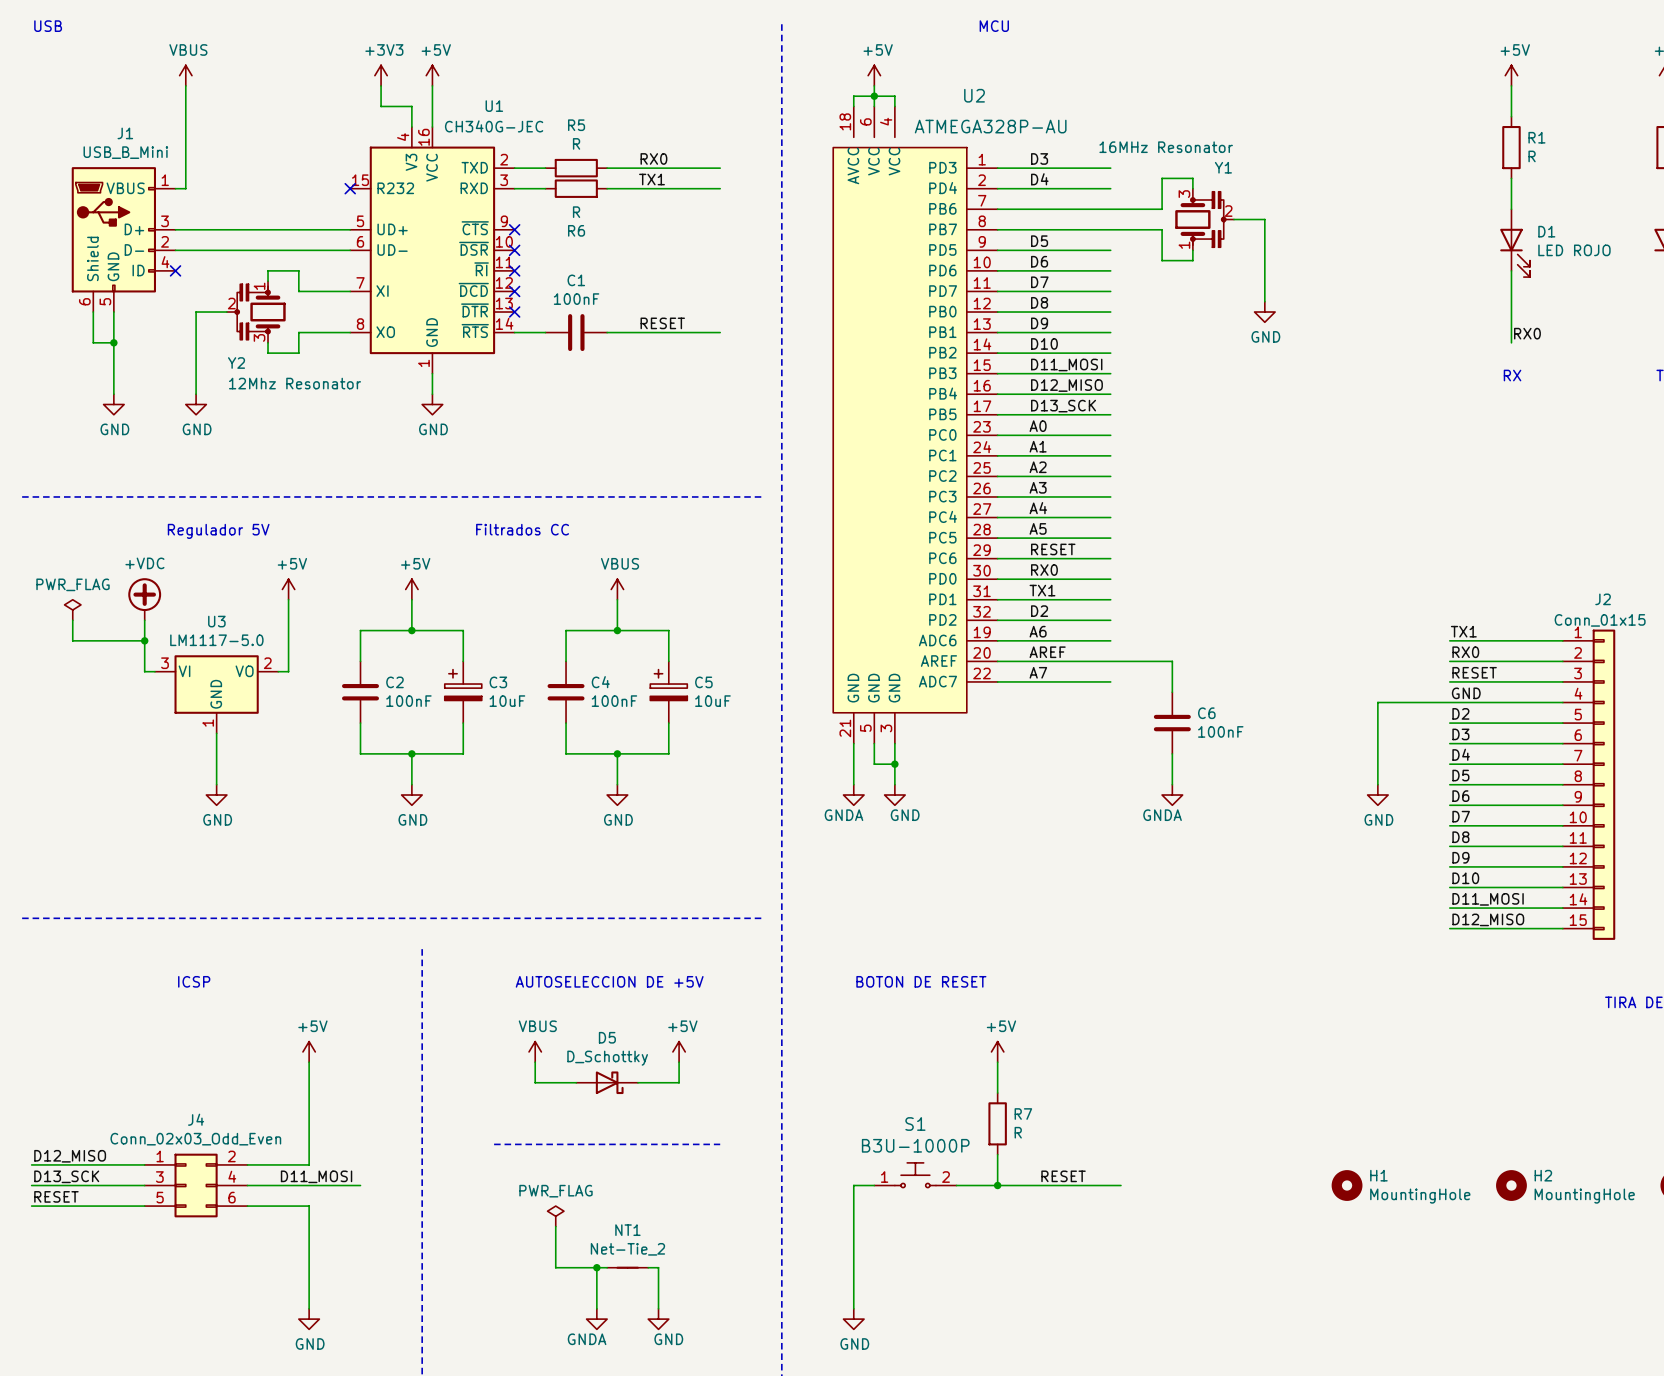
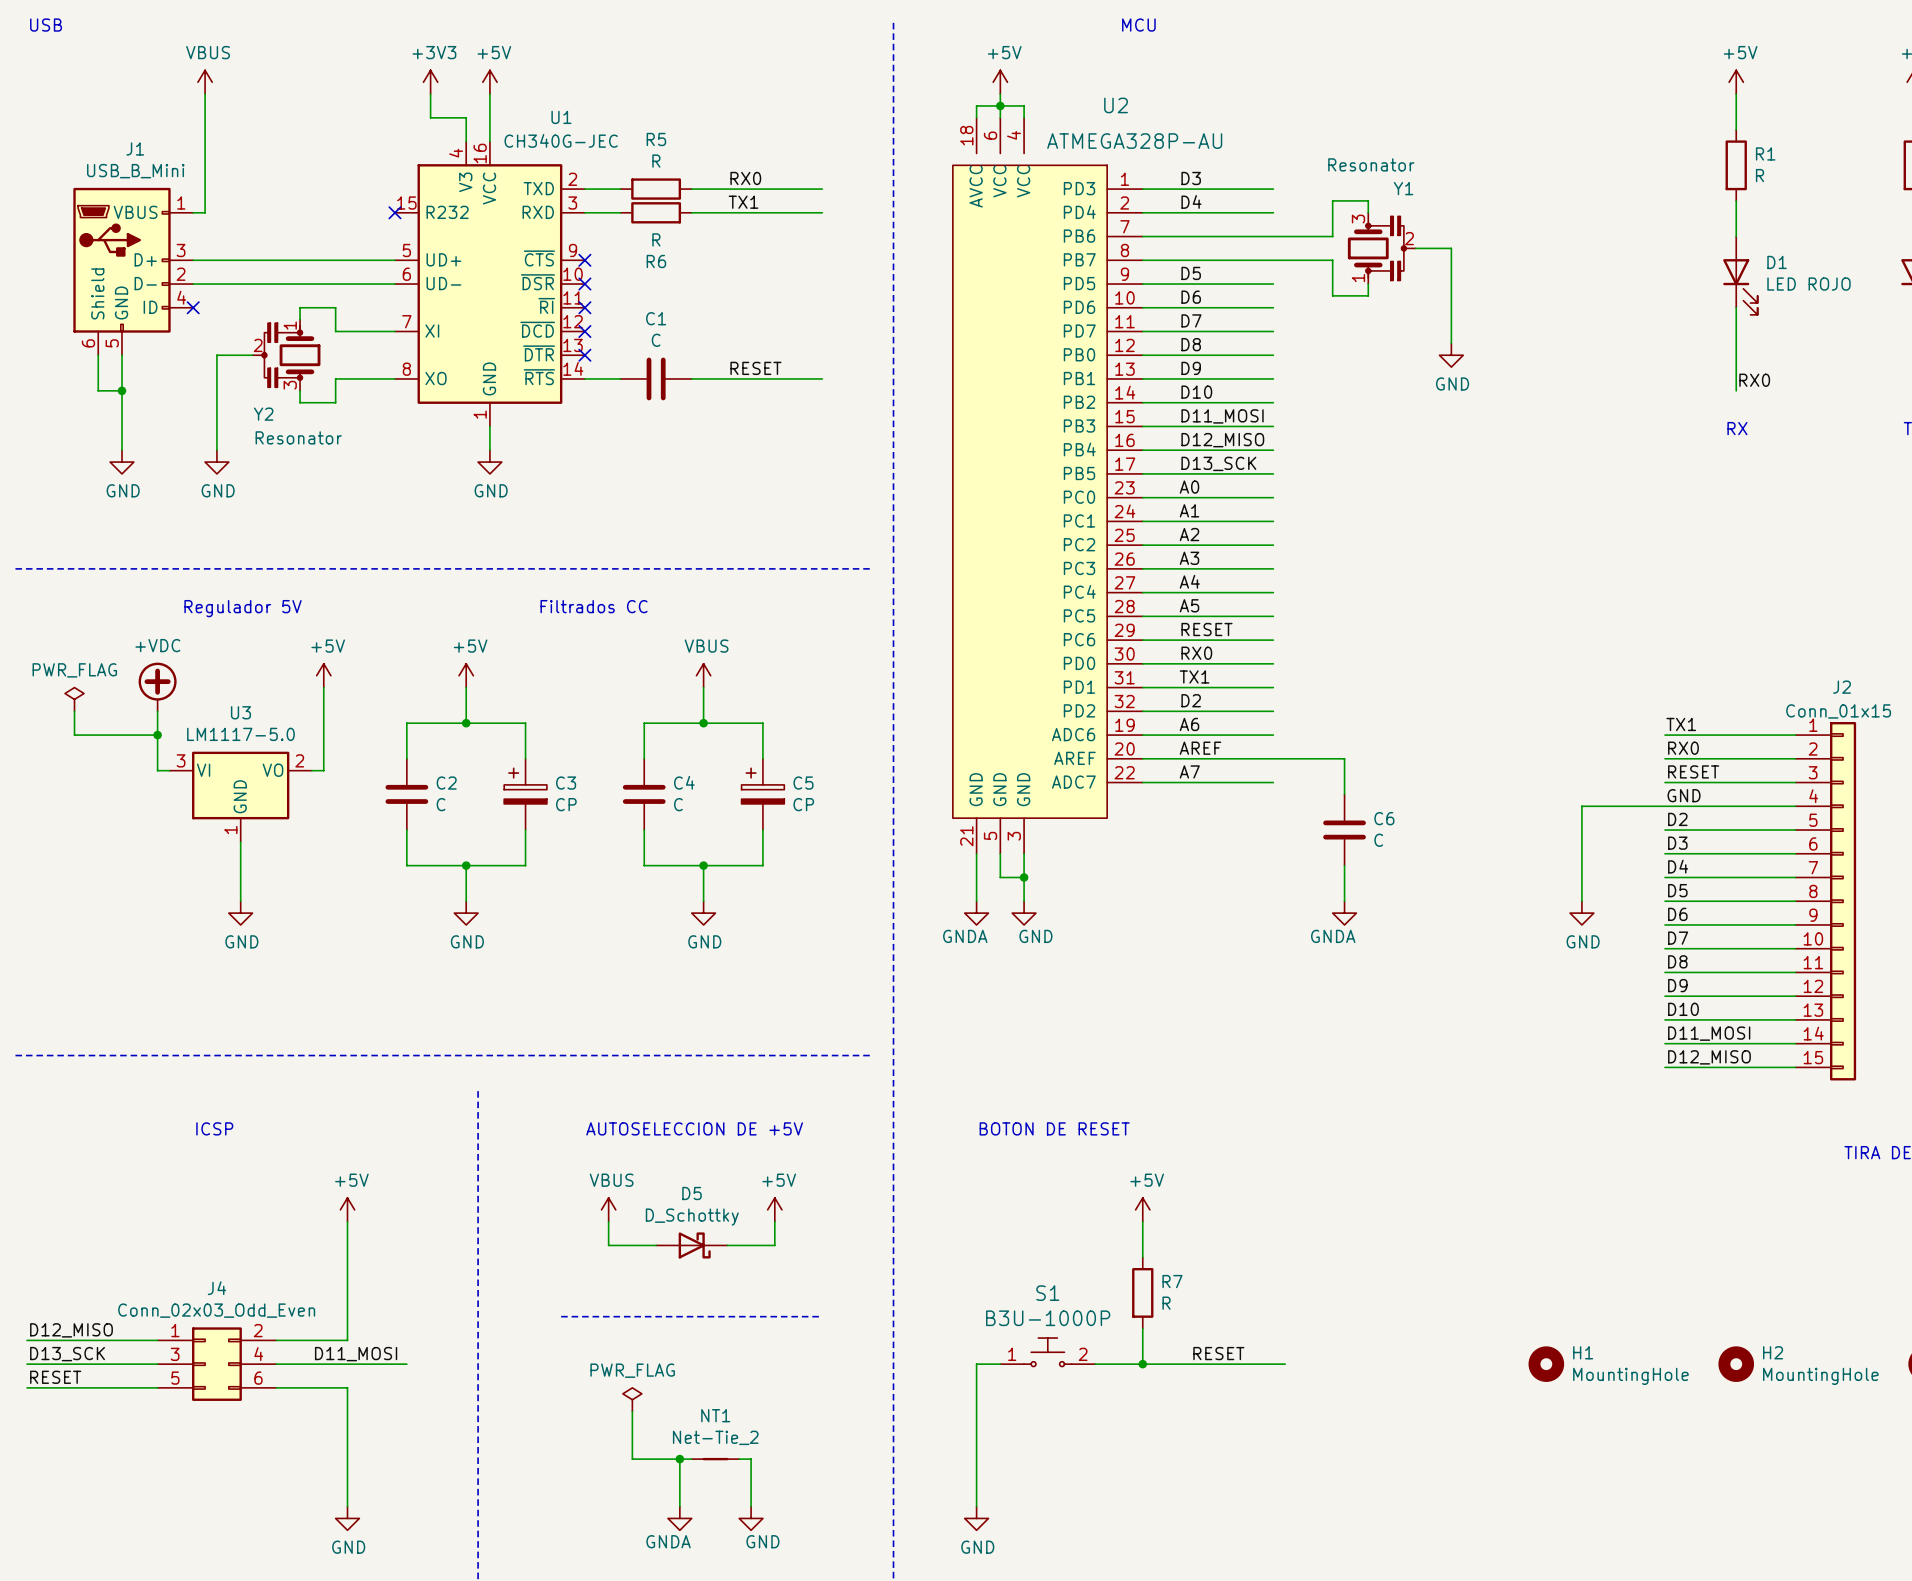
Y1 value: 16MHz Resonator (1166, 147) -> Resonator (1371, 164)
C1 value: 100nF (576, 299) -> C (656, 340)
Y2 value: 12Mhz Resonator (295, 383) -> Resonator (298, 437)
C2 value: 100nF (408, 701) -> C (441, 804)
C3 value: 10uF (507, 701) -> CP (566, 804)
C4 value: 100nF (614, 701) -> C (678, 804)
C5 value: 10uF (712, 701) -> CP (803, 804)
C6 value: 100nF (1220, 731) -> C (1378, 840)

